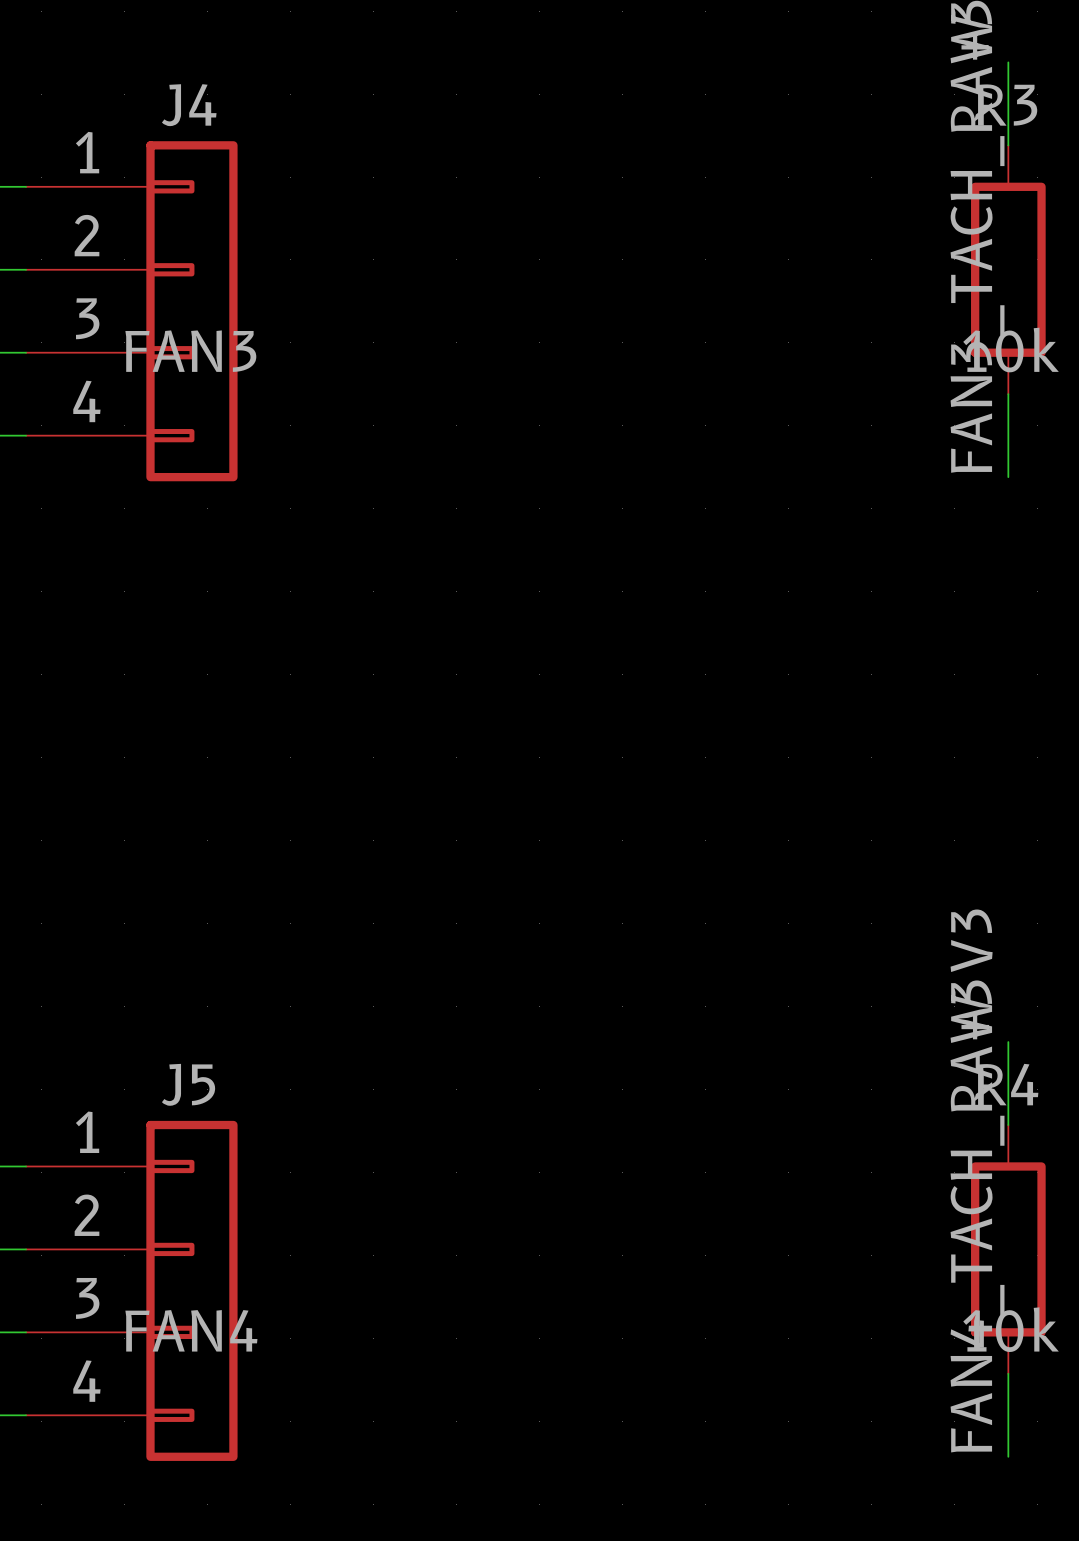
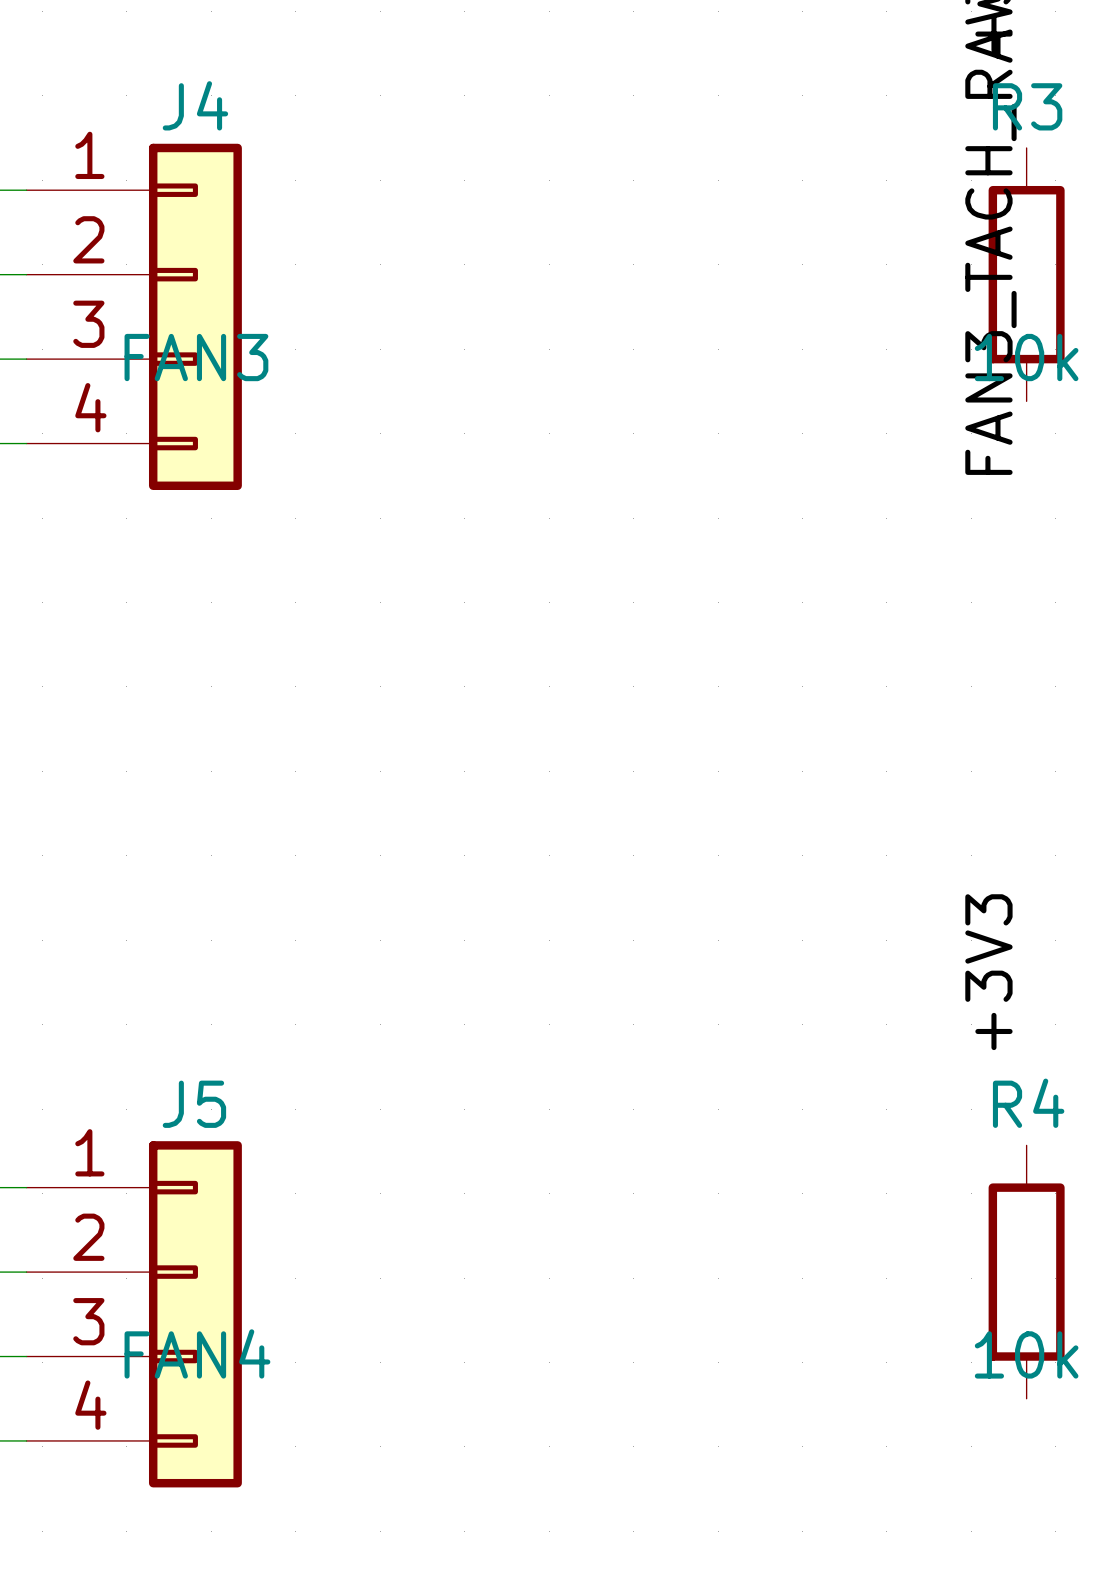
wire: (1008, 62) (1008, 145) -> none
wire: (1008, 394) (1008, 477) -> none
wire: (1008, 1042) (1008, 1125) -> none
label: FAN4_TACH_RAW (977, 1223) -> none
wire: (1008, 1373) (1008, 1456) -> none

